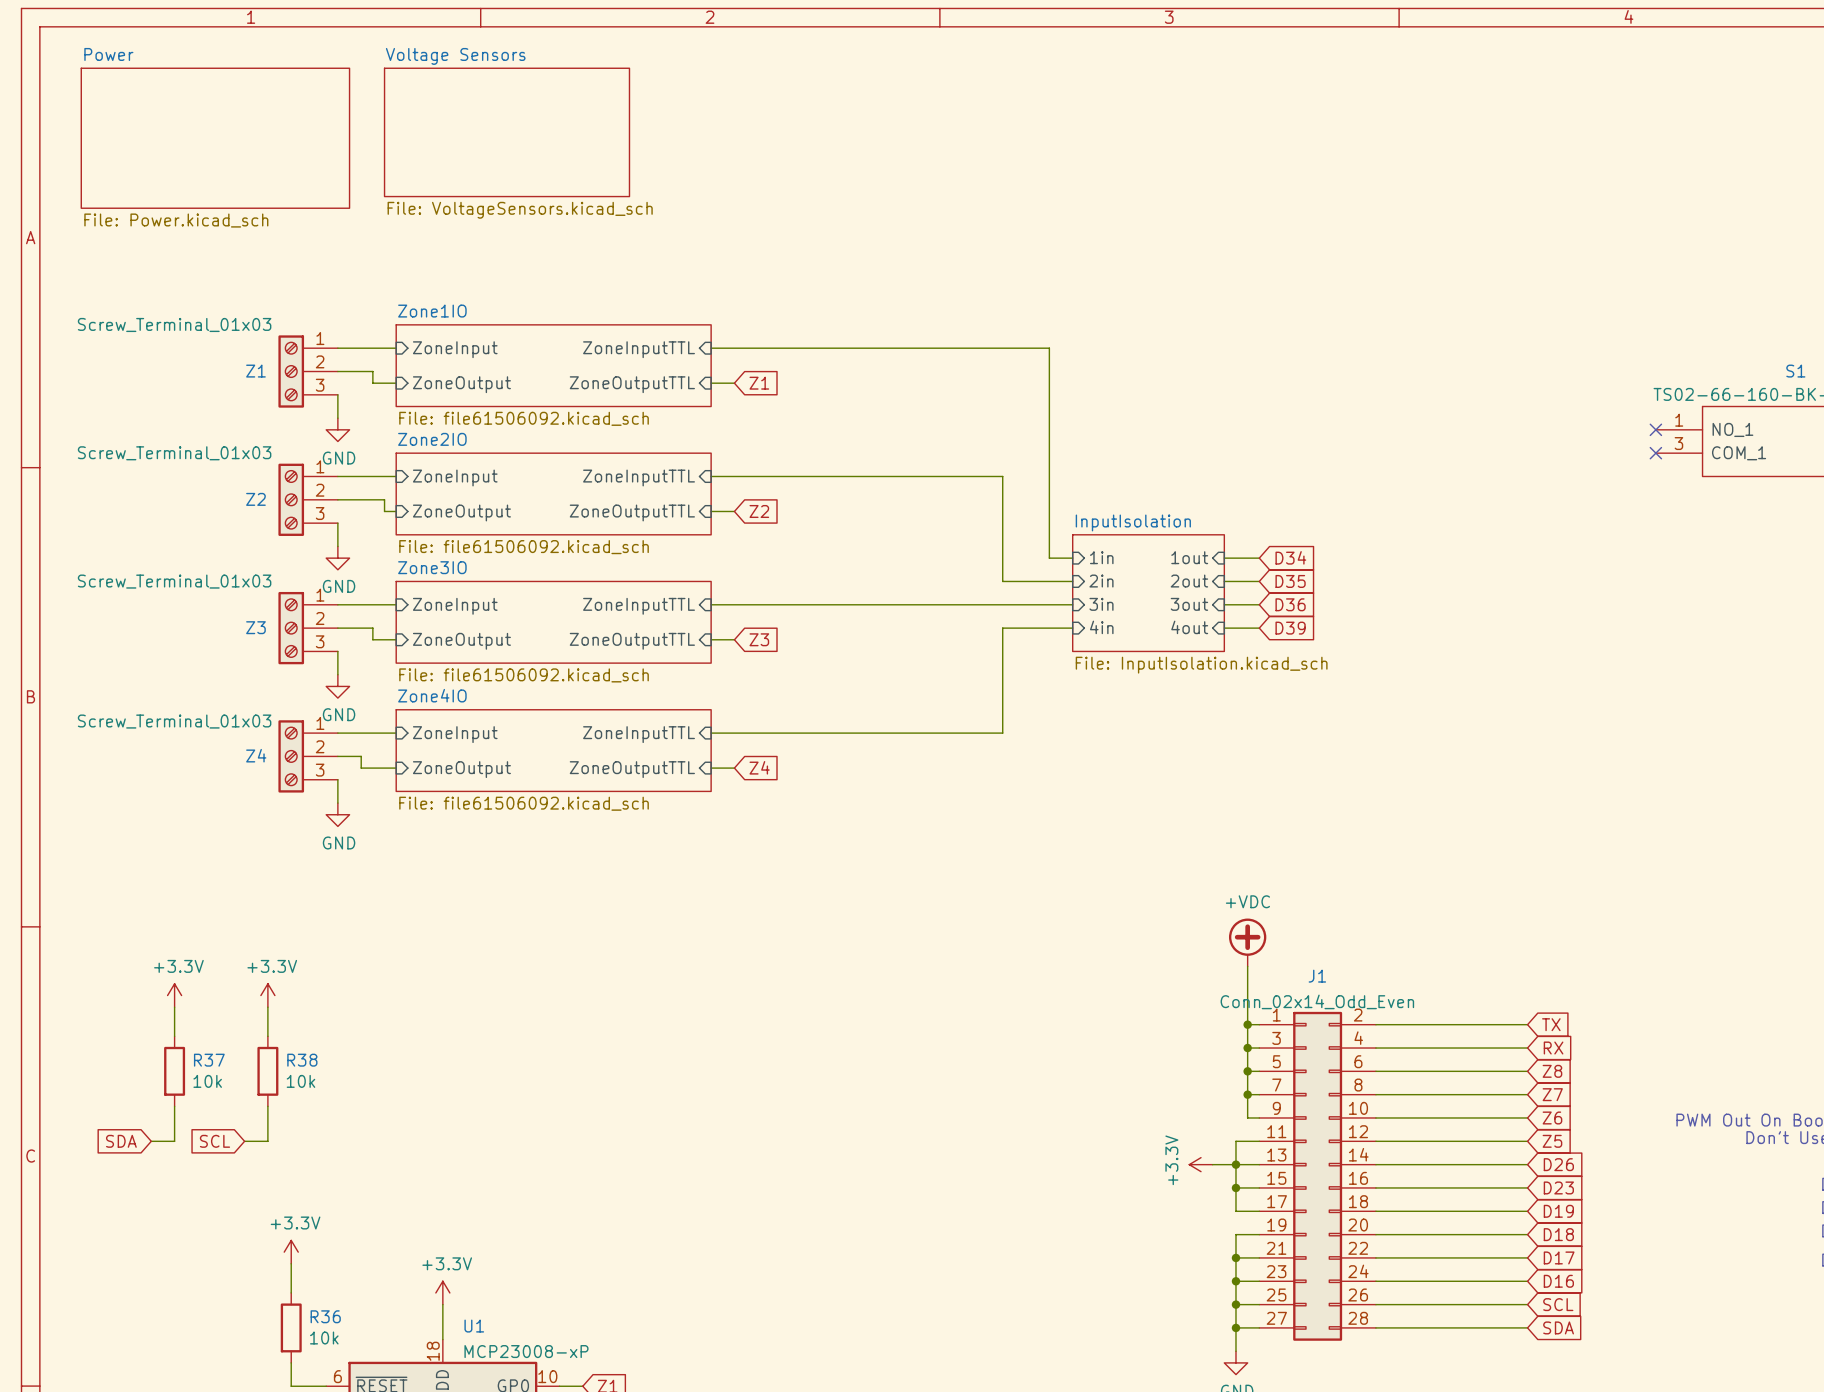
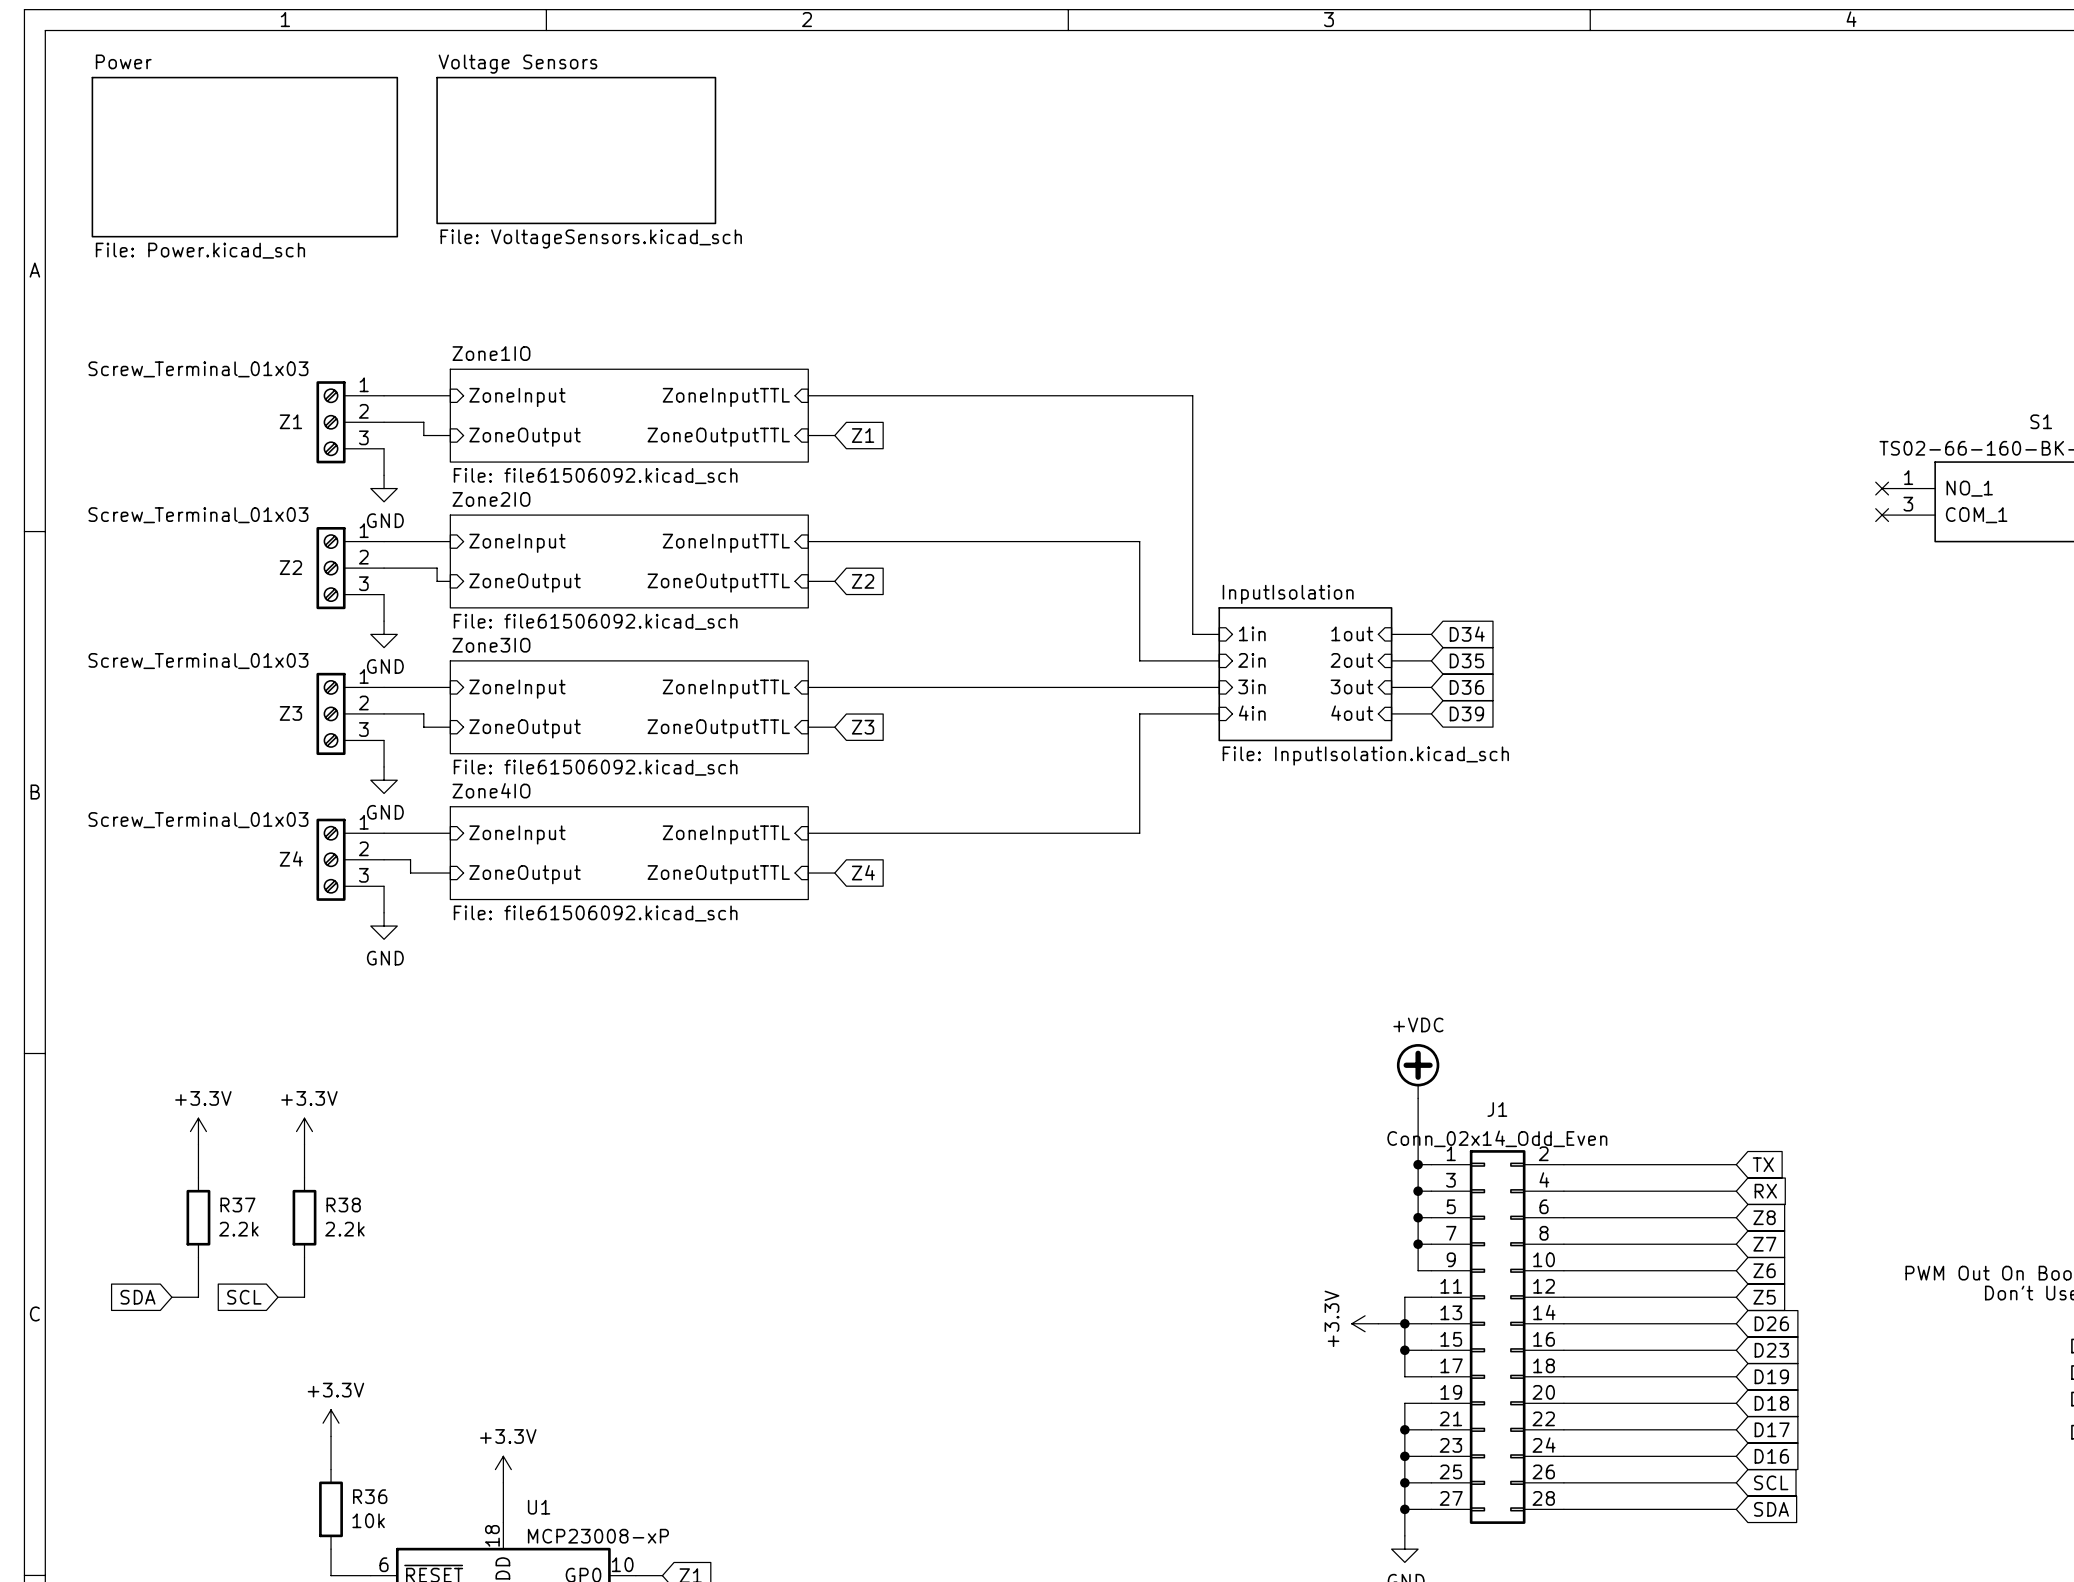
R37 value: 10k (207, 1081) -> 2.2k (238, 1229)
R38 value: 10k (300, 1081) -> 2.2k (344, 1229)

